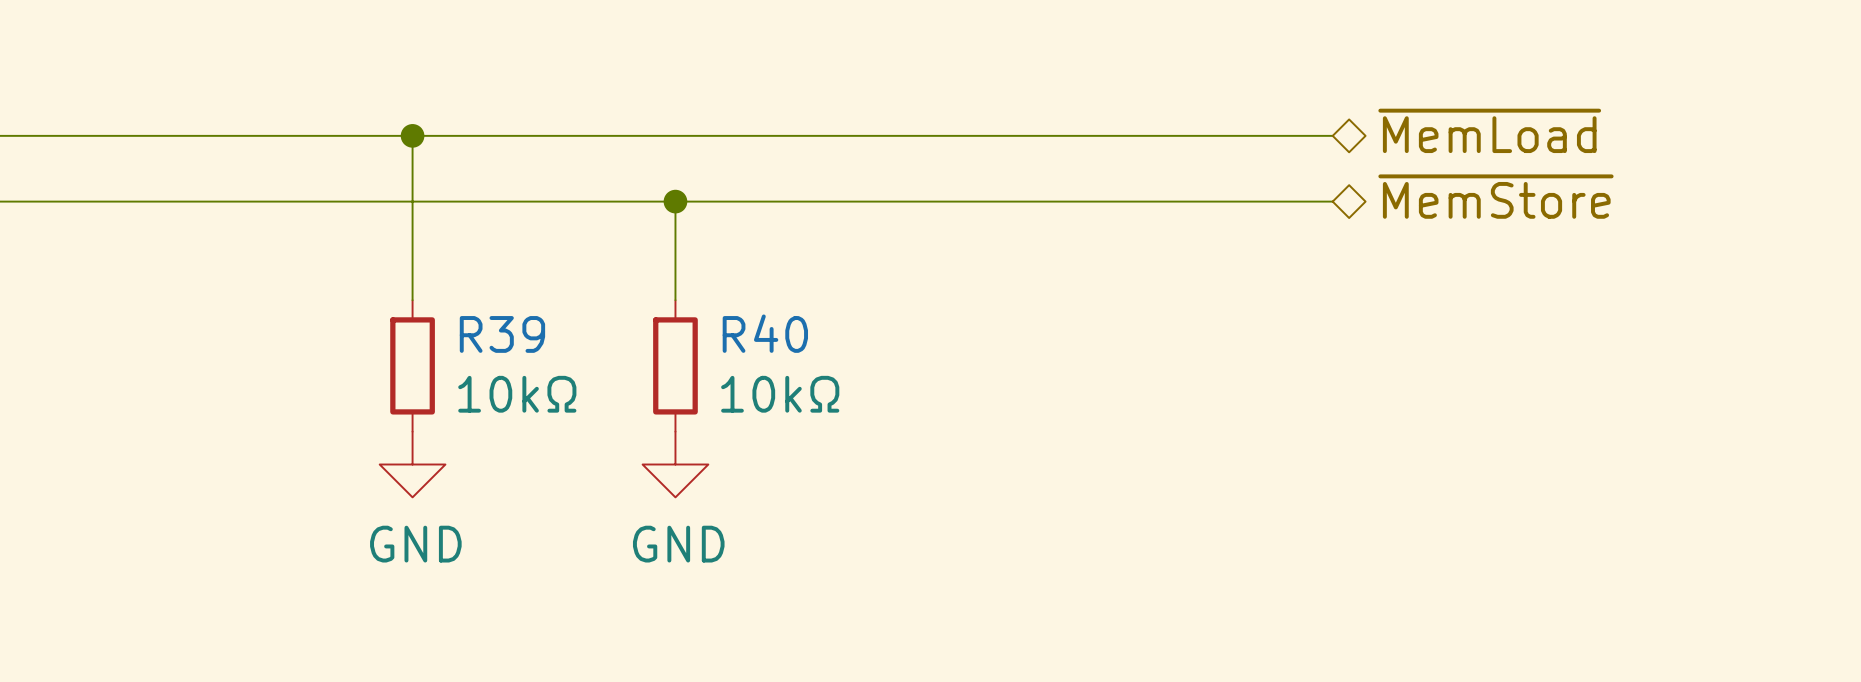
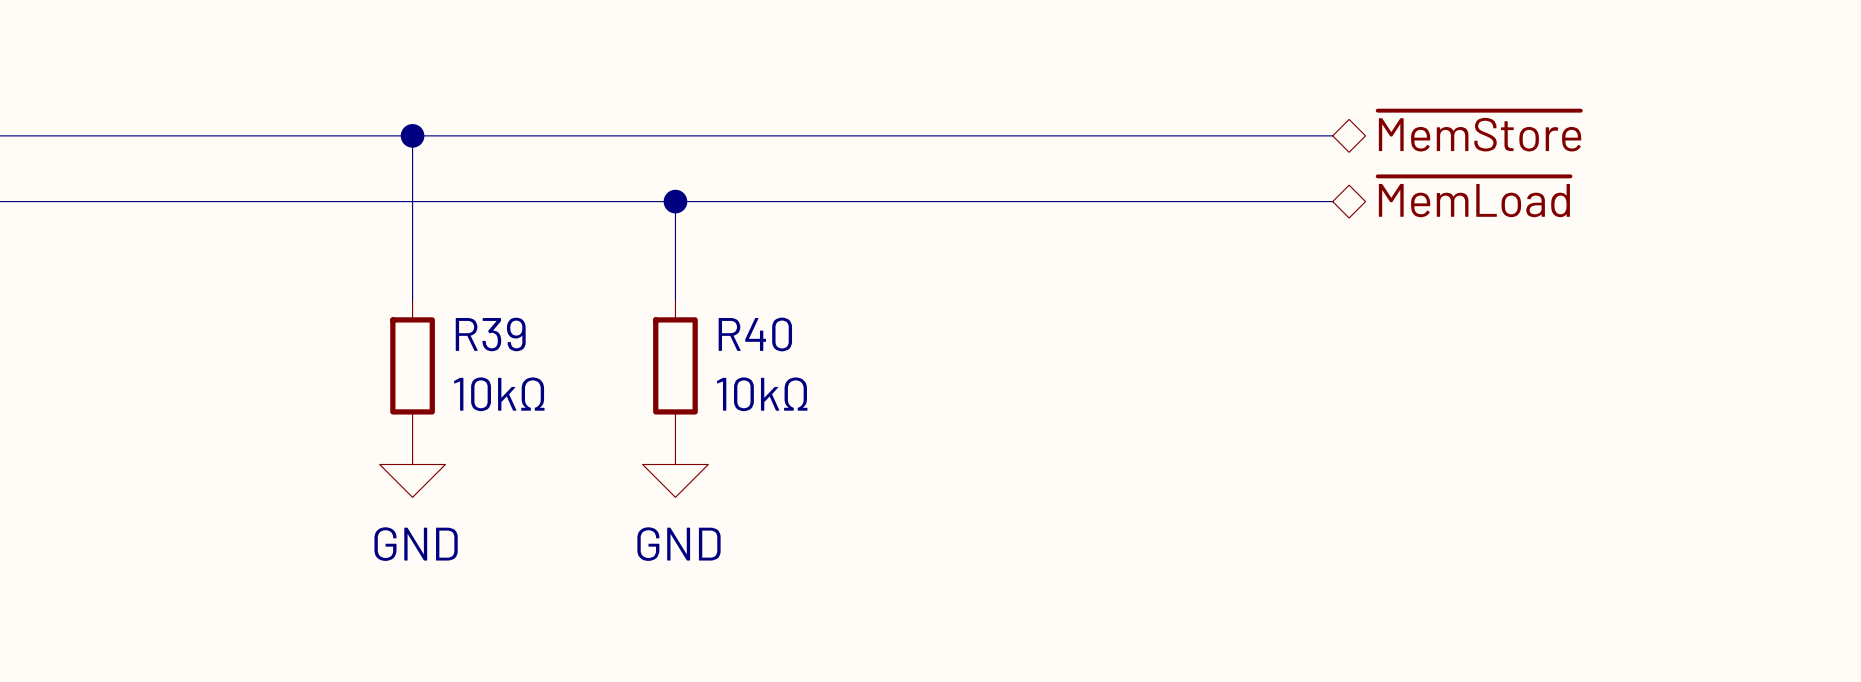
hierarchical label: ~{MemLoad} (1489, 130) -> ~{MemStore} (1479, 131)
hierarchical label: ~{MemStore} (1495, 196) -> ~{MemLoad} (1474, 196)

